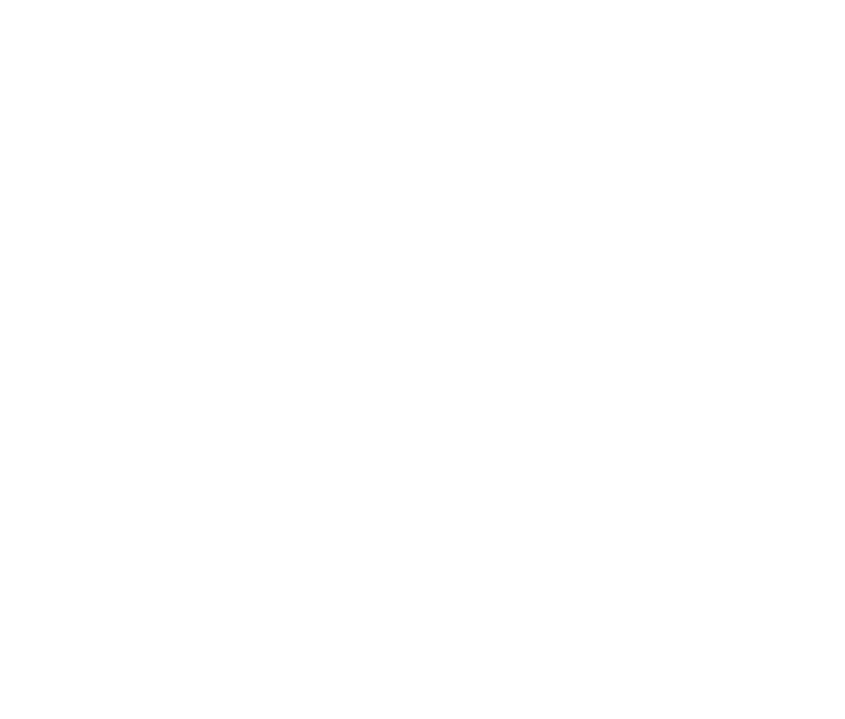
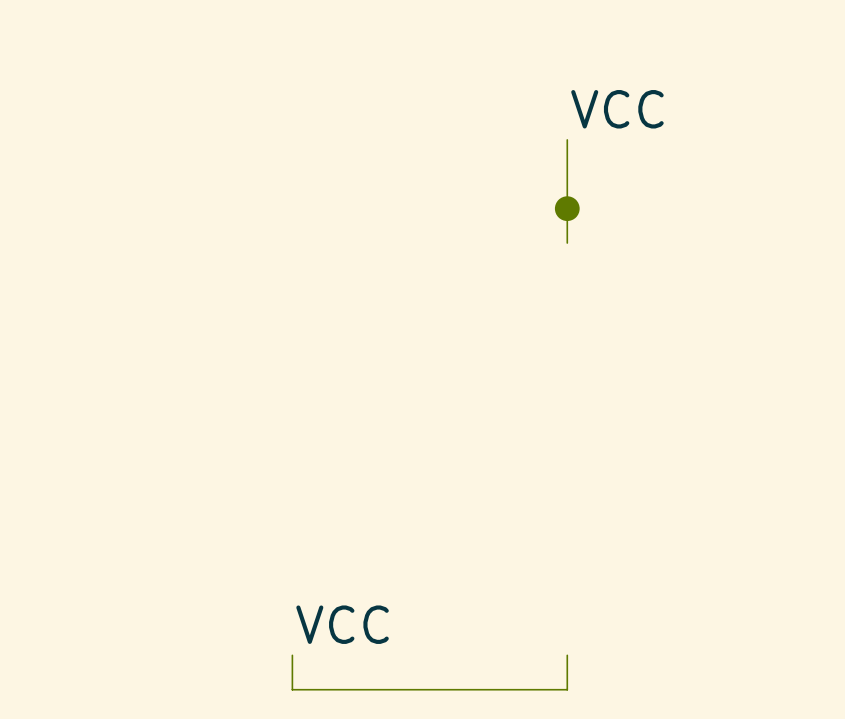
label: none -> VCC (617, 109)
wire: none -> (567, 139) (567, 243)
junction: none -> (567, 208)
label: none -> VCC (342, 624)
wire: none -> (292, 655) (292, 689) (567, 689) (567, 655)

